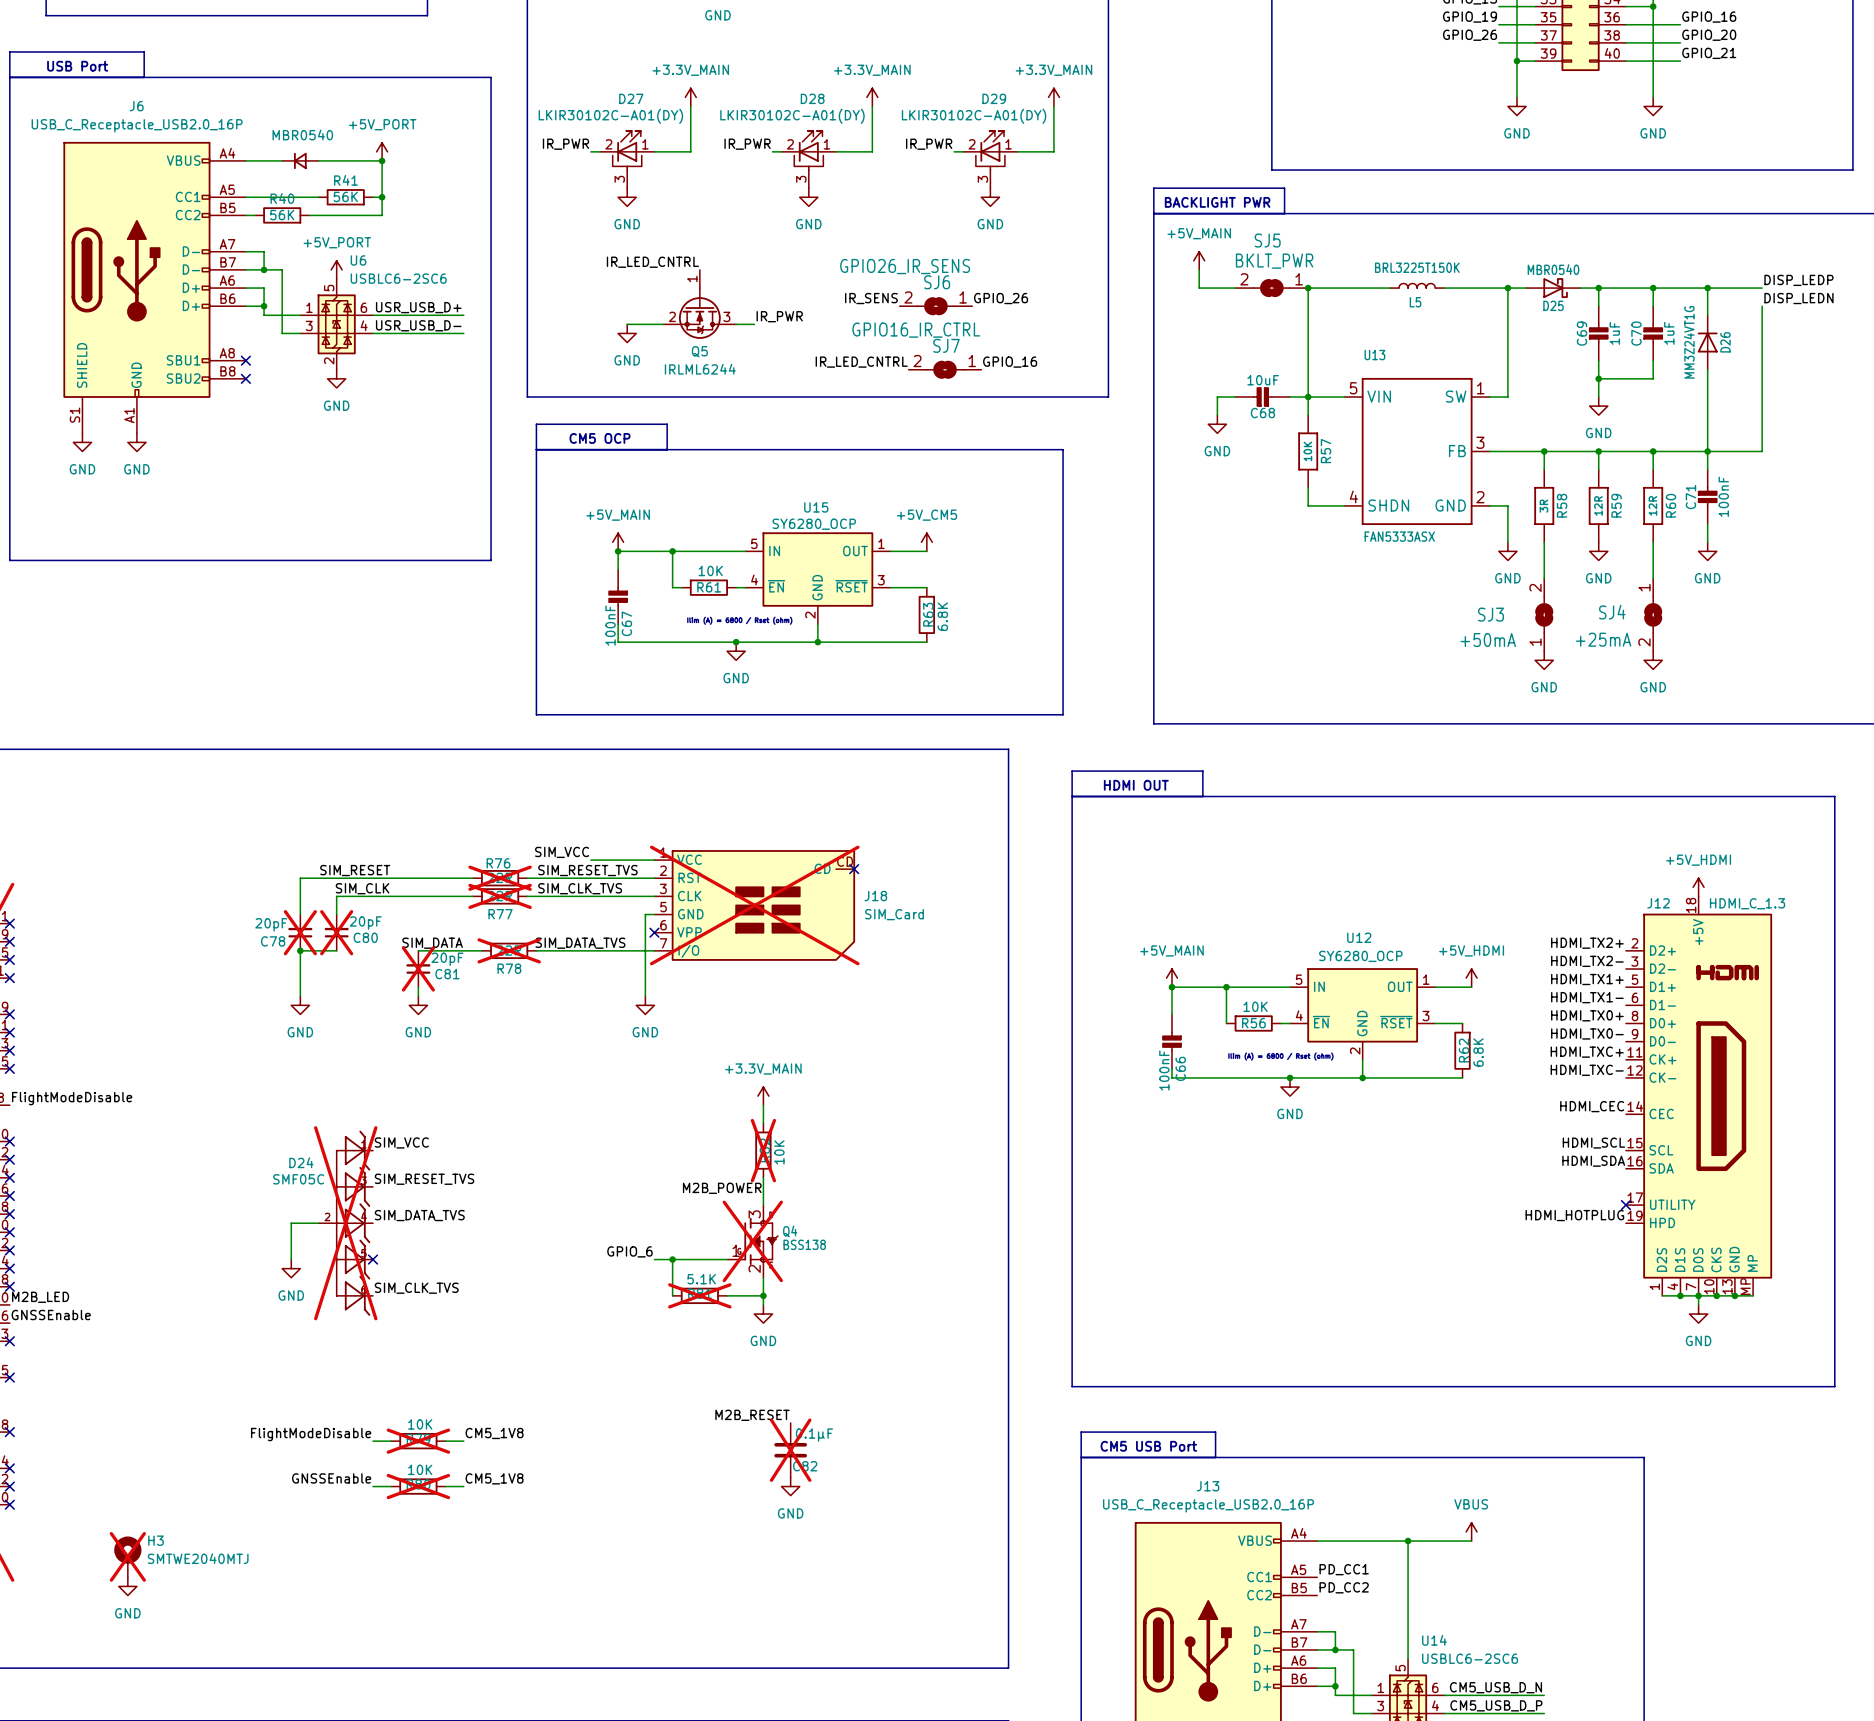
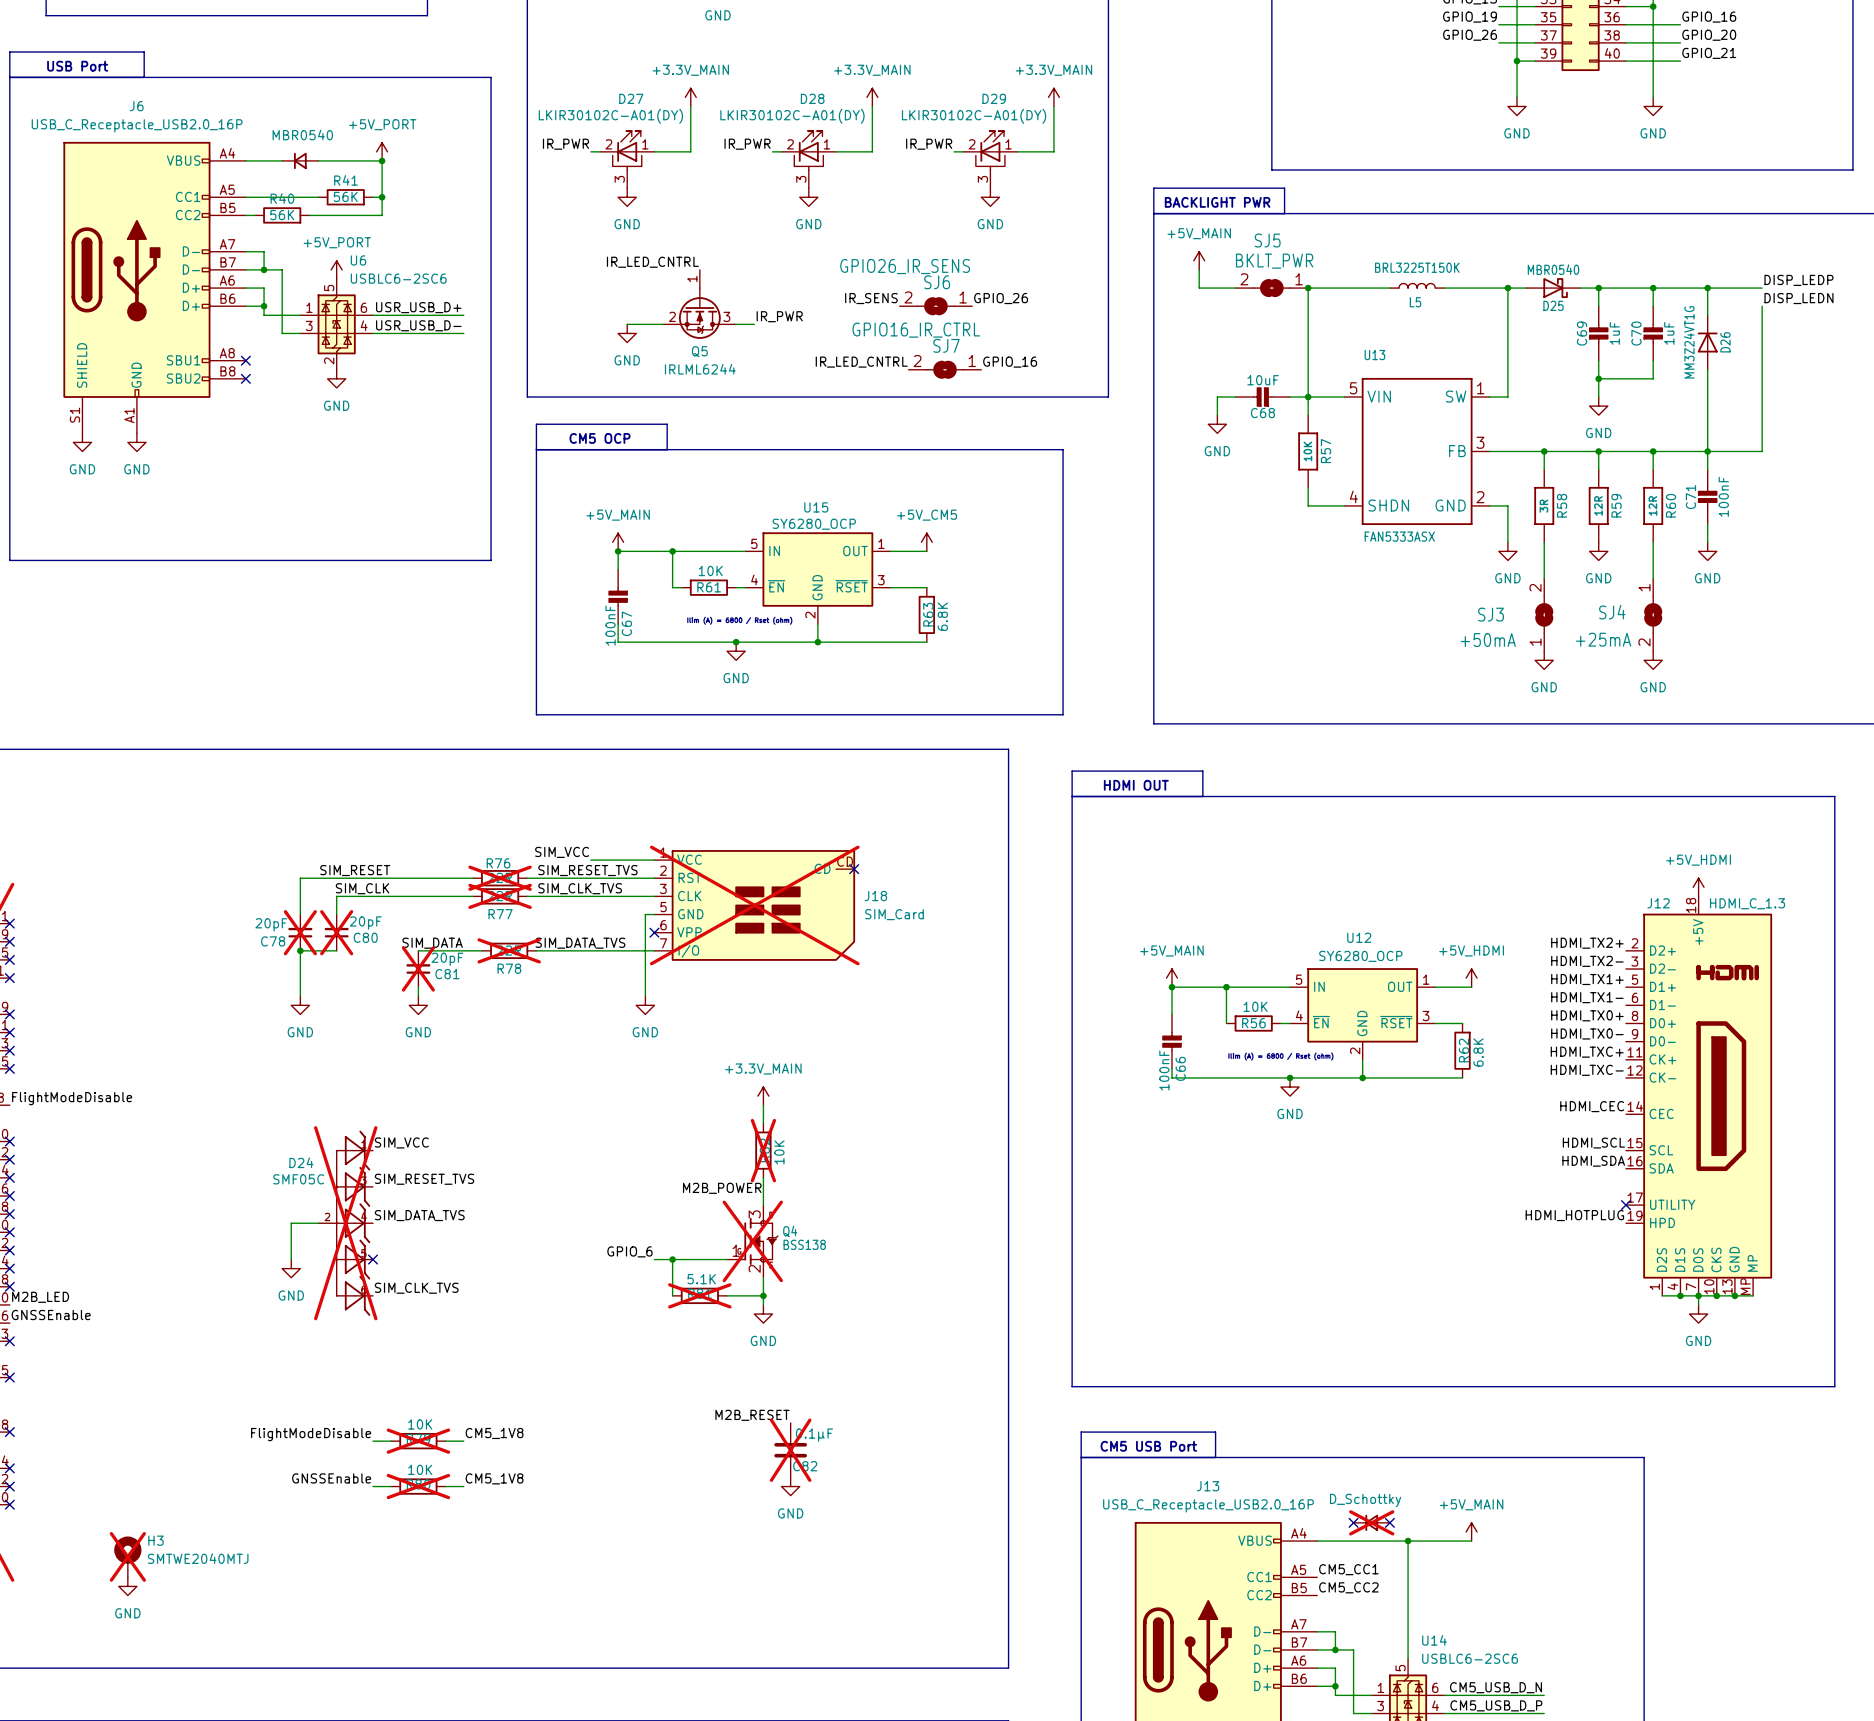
no-connect mark: none -> (1353, 1522)
part: none -> D_Schottky (1371, 1522)
no-connect mark: none -> (1389, 1522)
power symbol: VBUS (1471, 1531) -> +5V_MAIN (1471, 1531)
label: PD_CC1 (1344, 1569) -> CM5_CC1 (1348, 1569)
label: PD_CC2 (1344, 1587) -> CM5_CC2 (1348, 1587)

